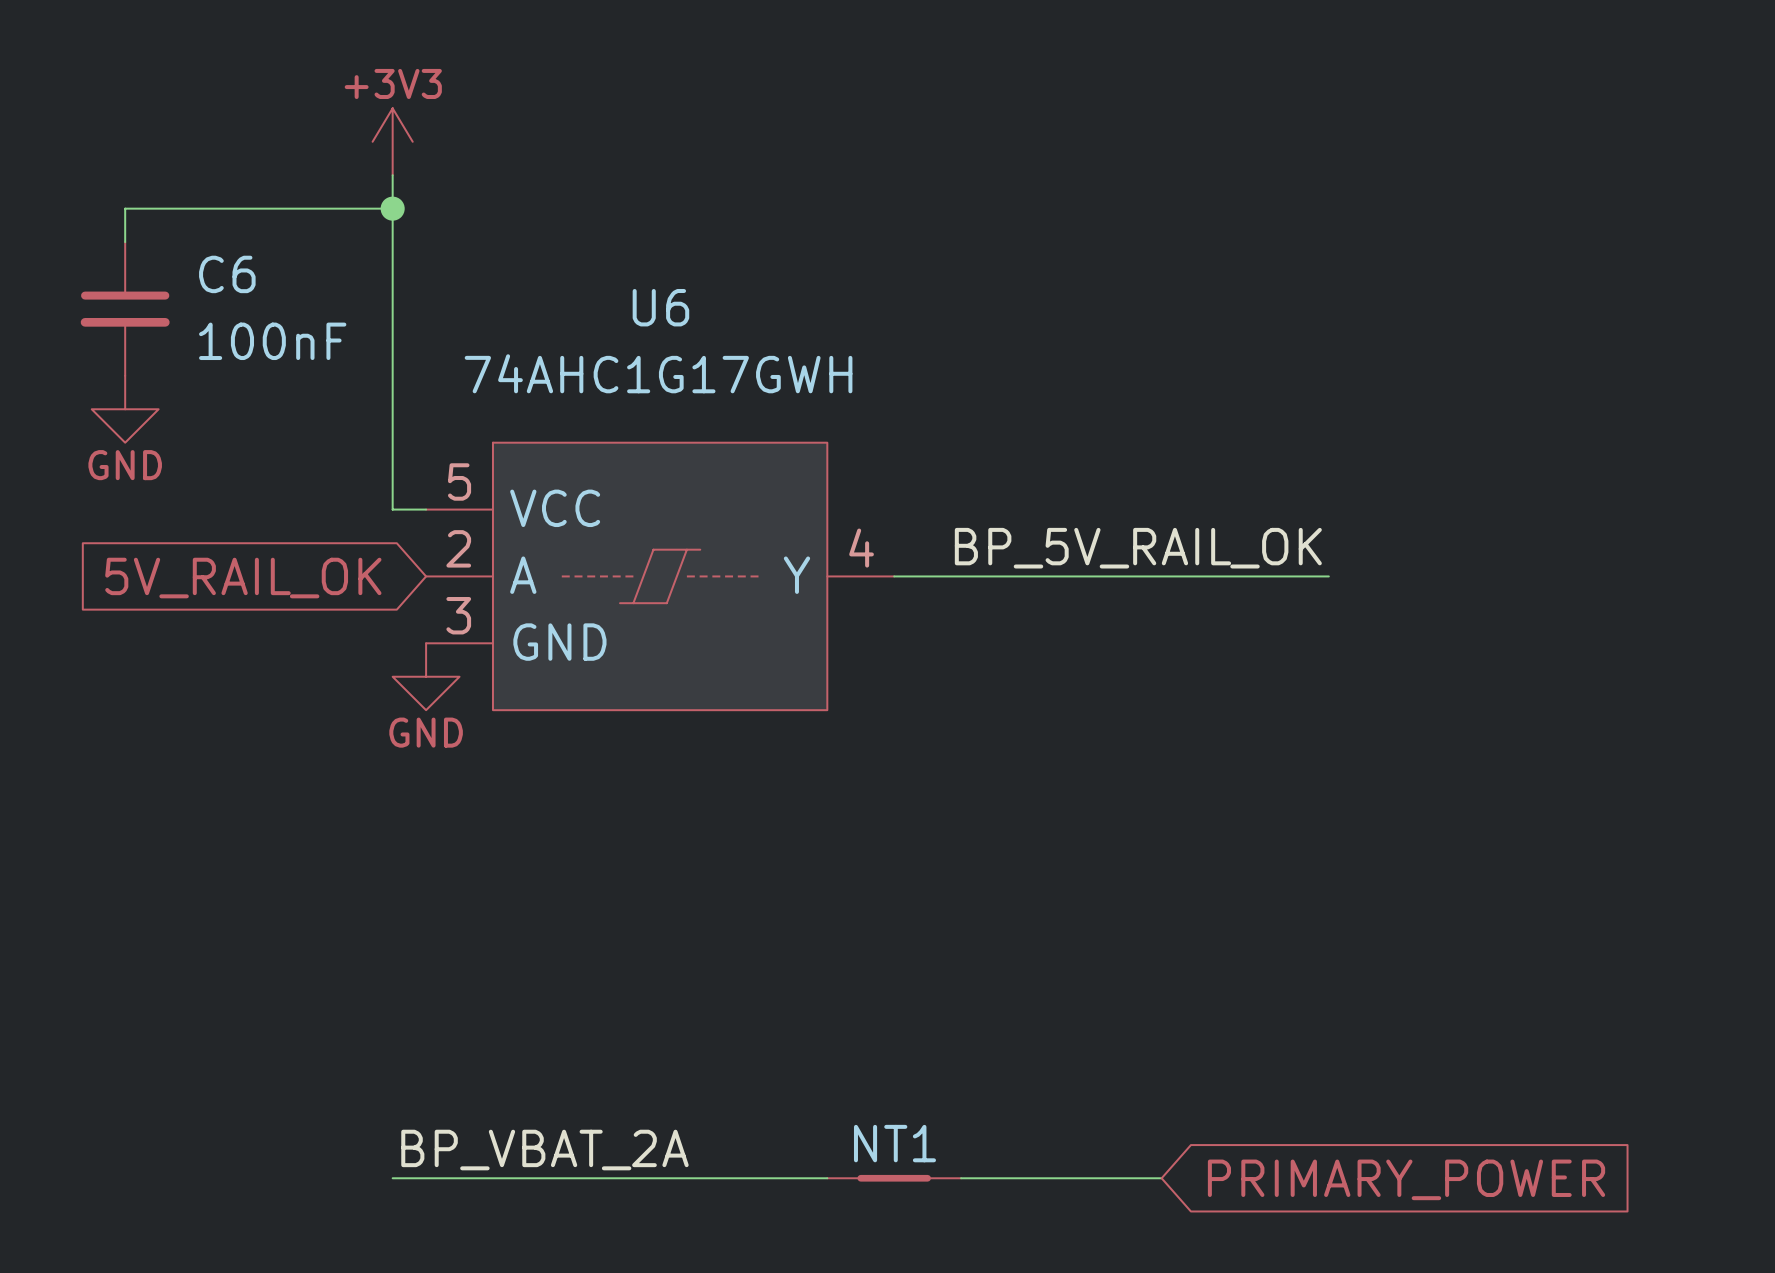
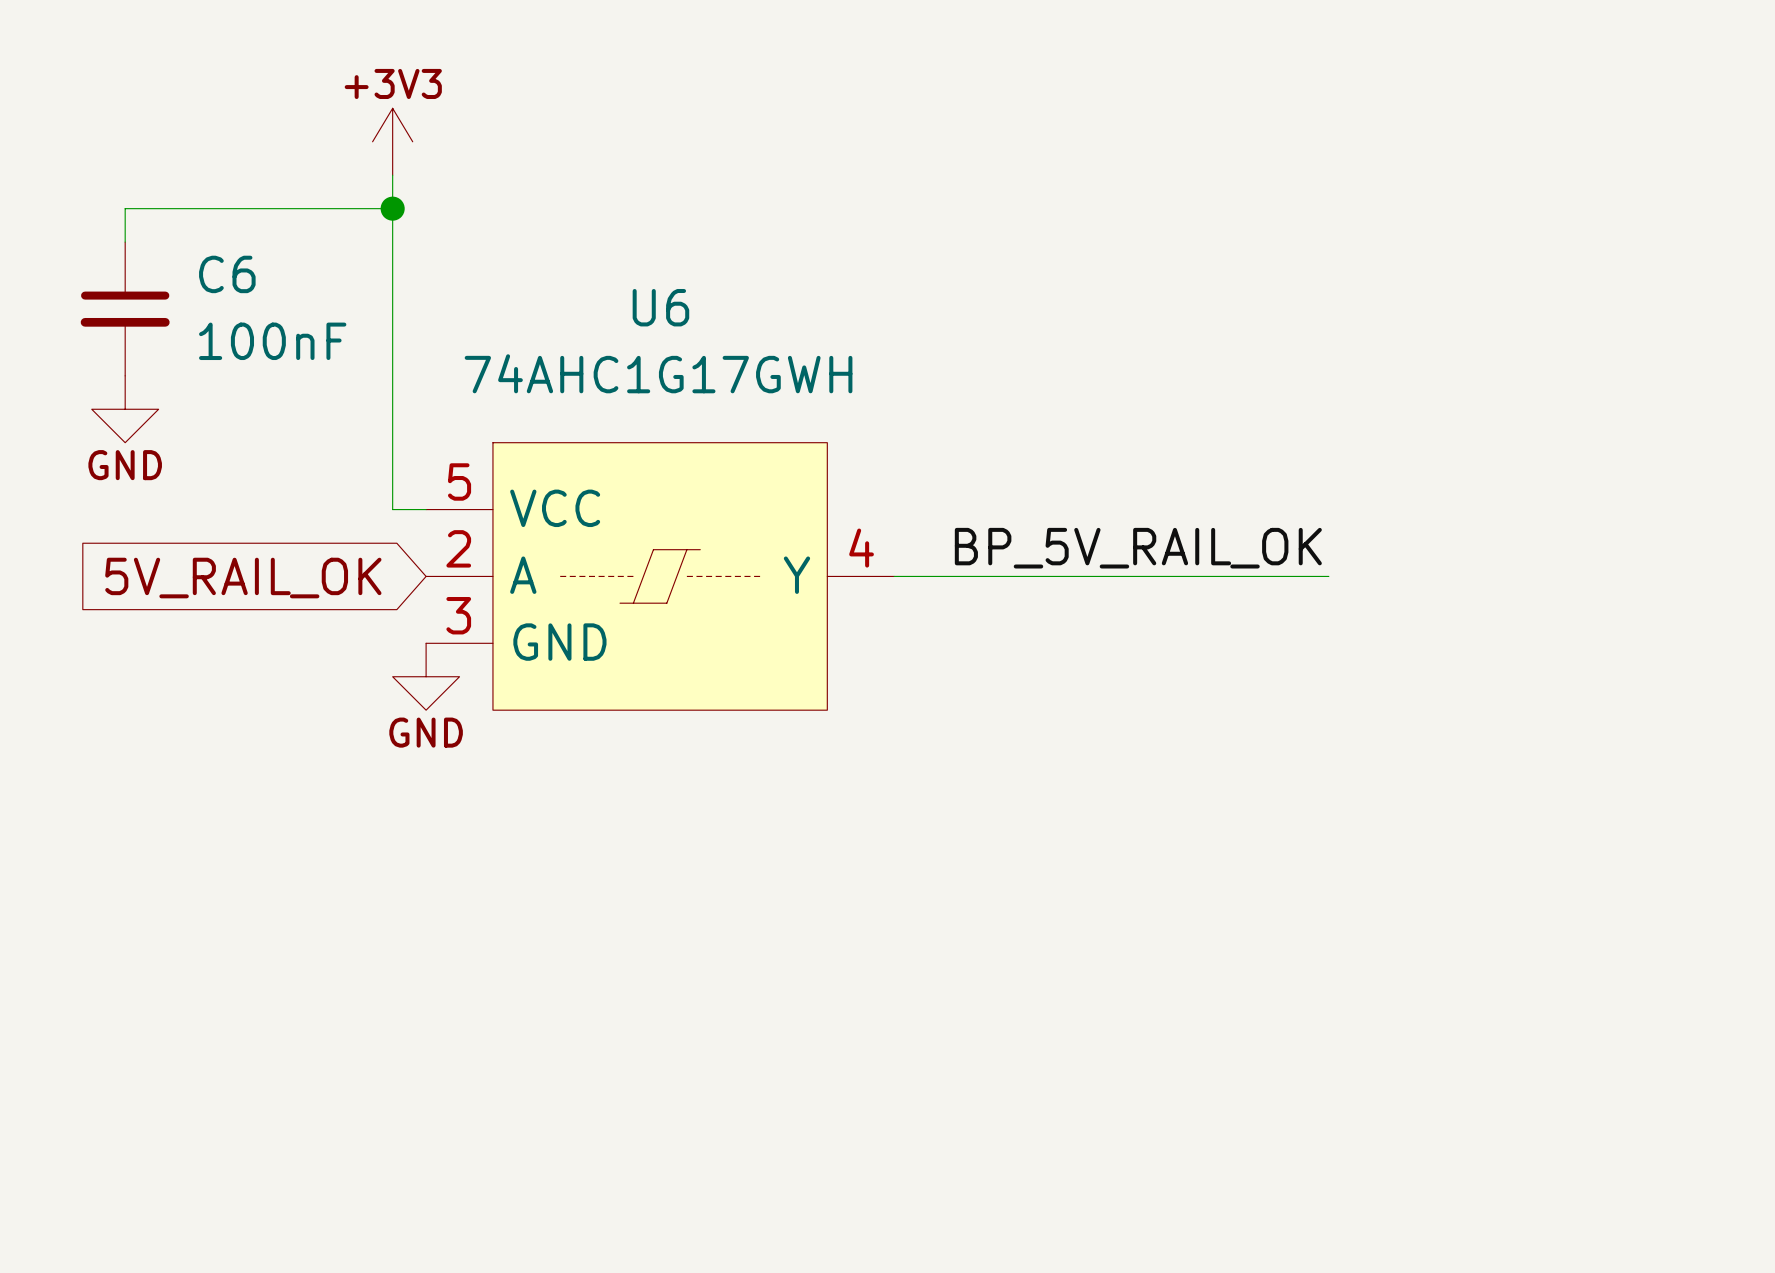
label: BP_VBAT_2A (544, 1150) -> none
wire: (392, 1178) (827, 1178) -> none
NT1: (894, 1178) -> none
wire: (961, 1178) (1161, 1178) -> none
global label: PRIMARY_POWER (1406, 1179) -> none

